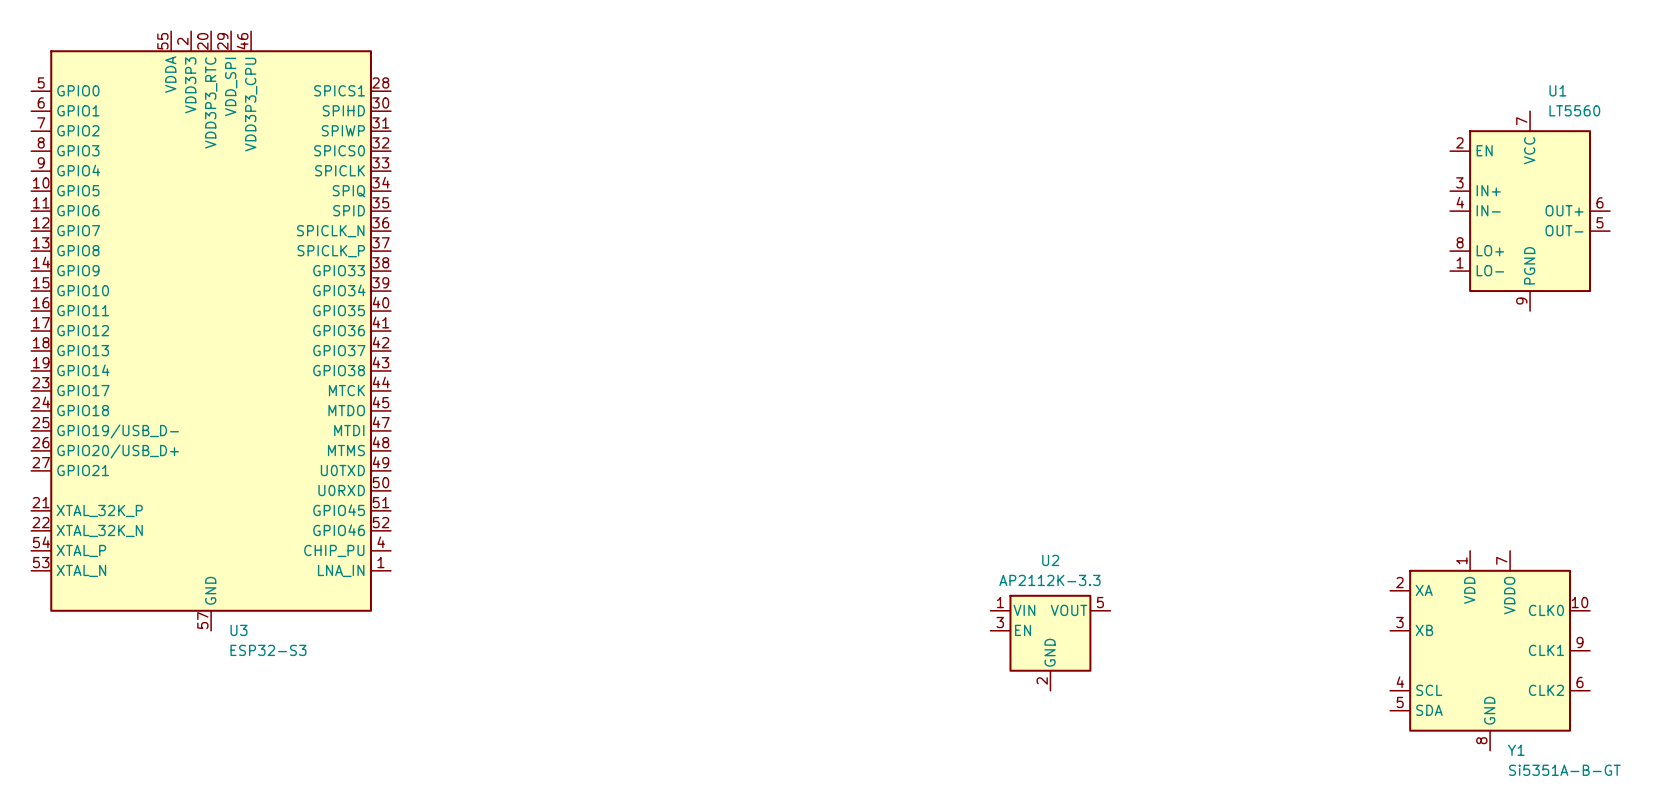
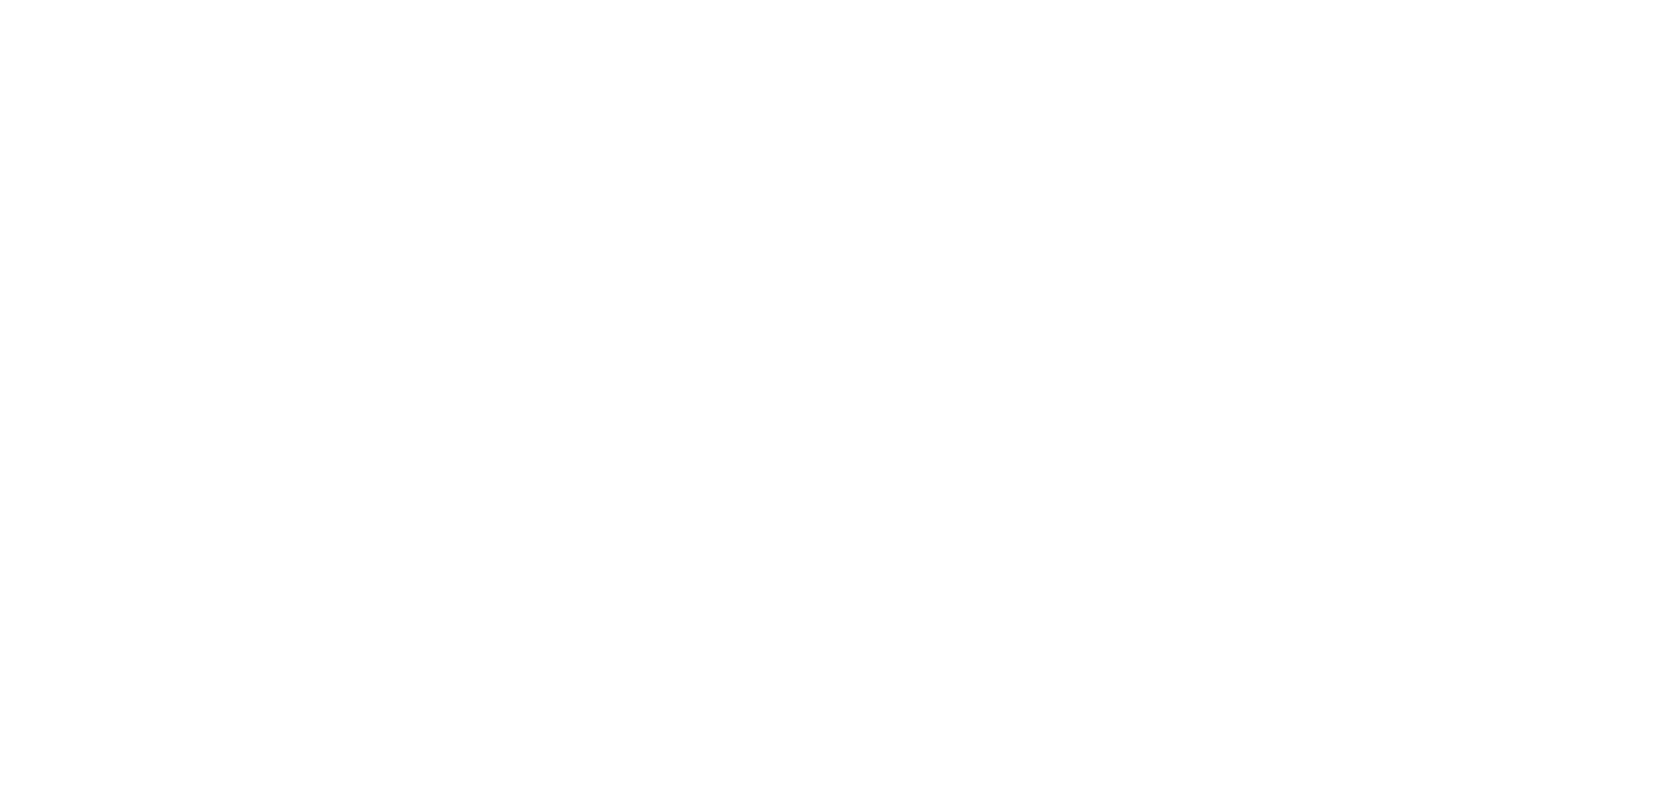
U1: LT5560 (1530, 211) -> none
U3: ESP32-S3 (211, 331) -> none
U2: AP2112K-3.3 (1050, 642) -> none
Y1: Si5351A-B-GT (1490, 650) -> none

